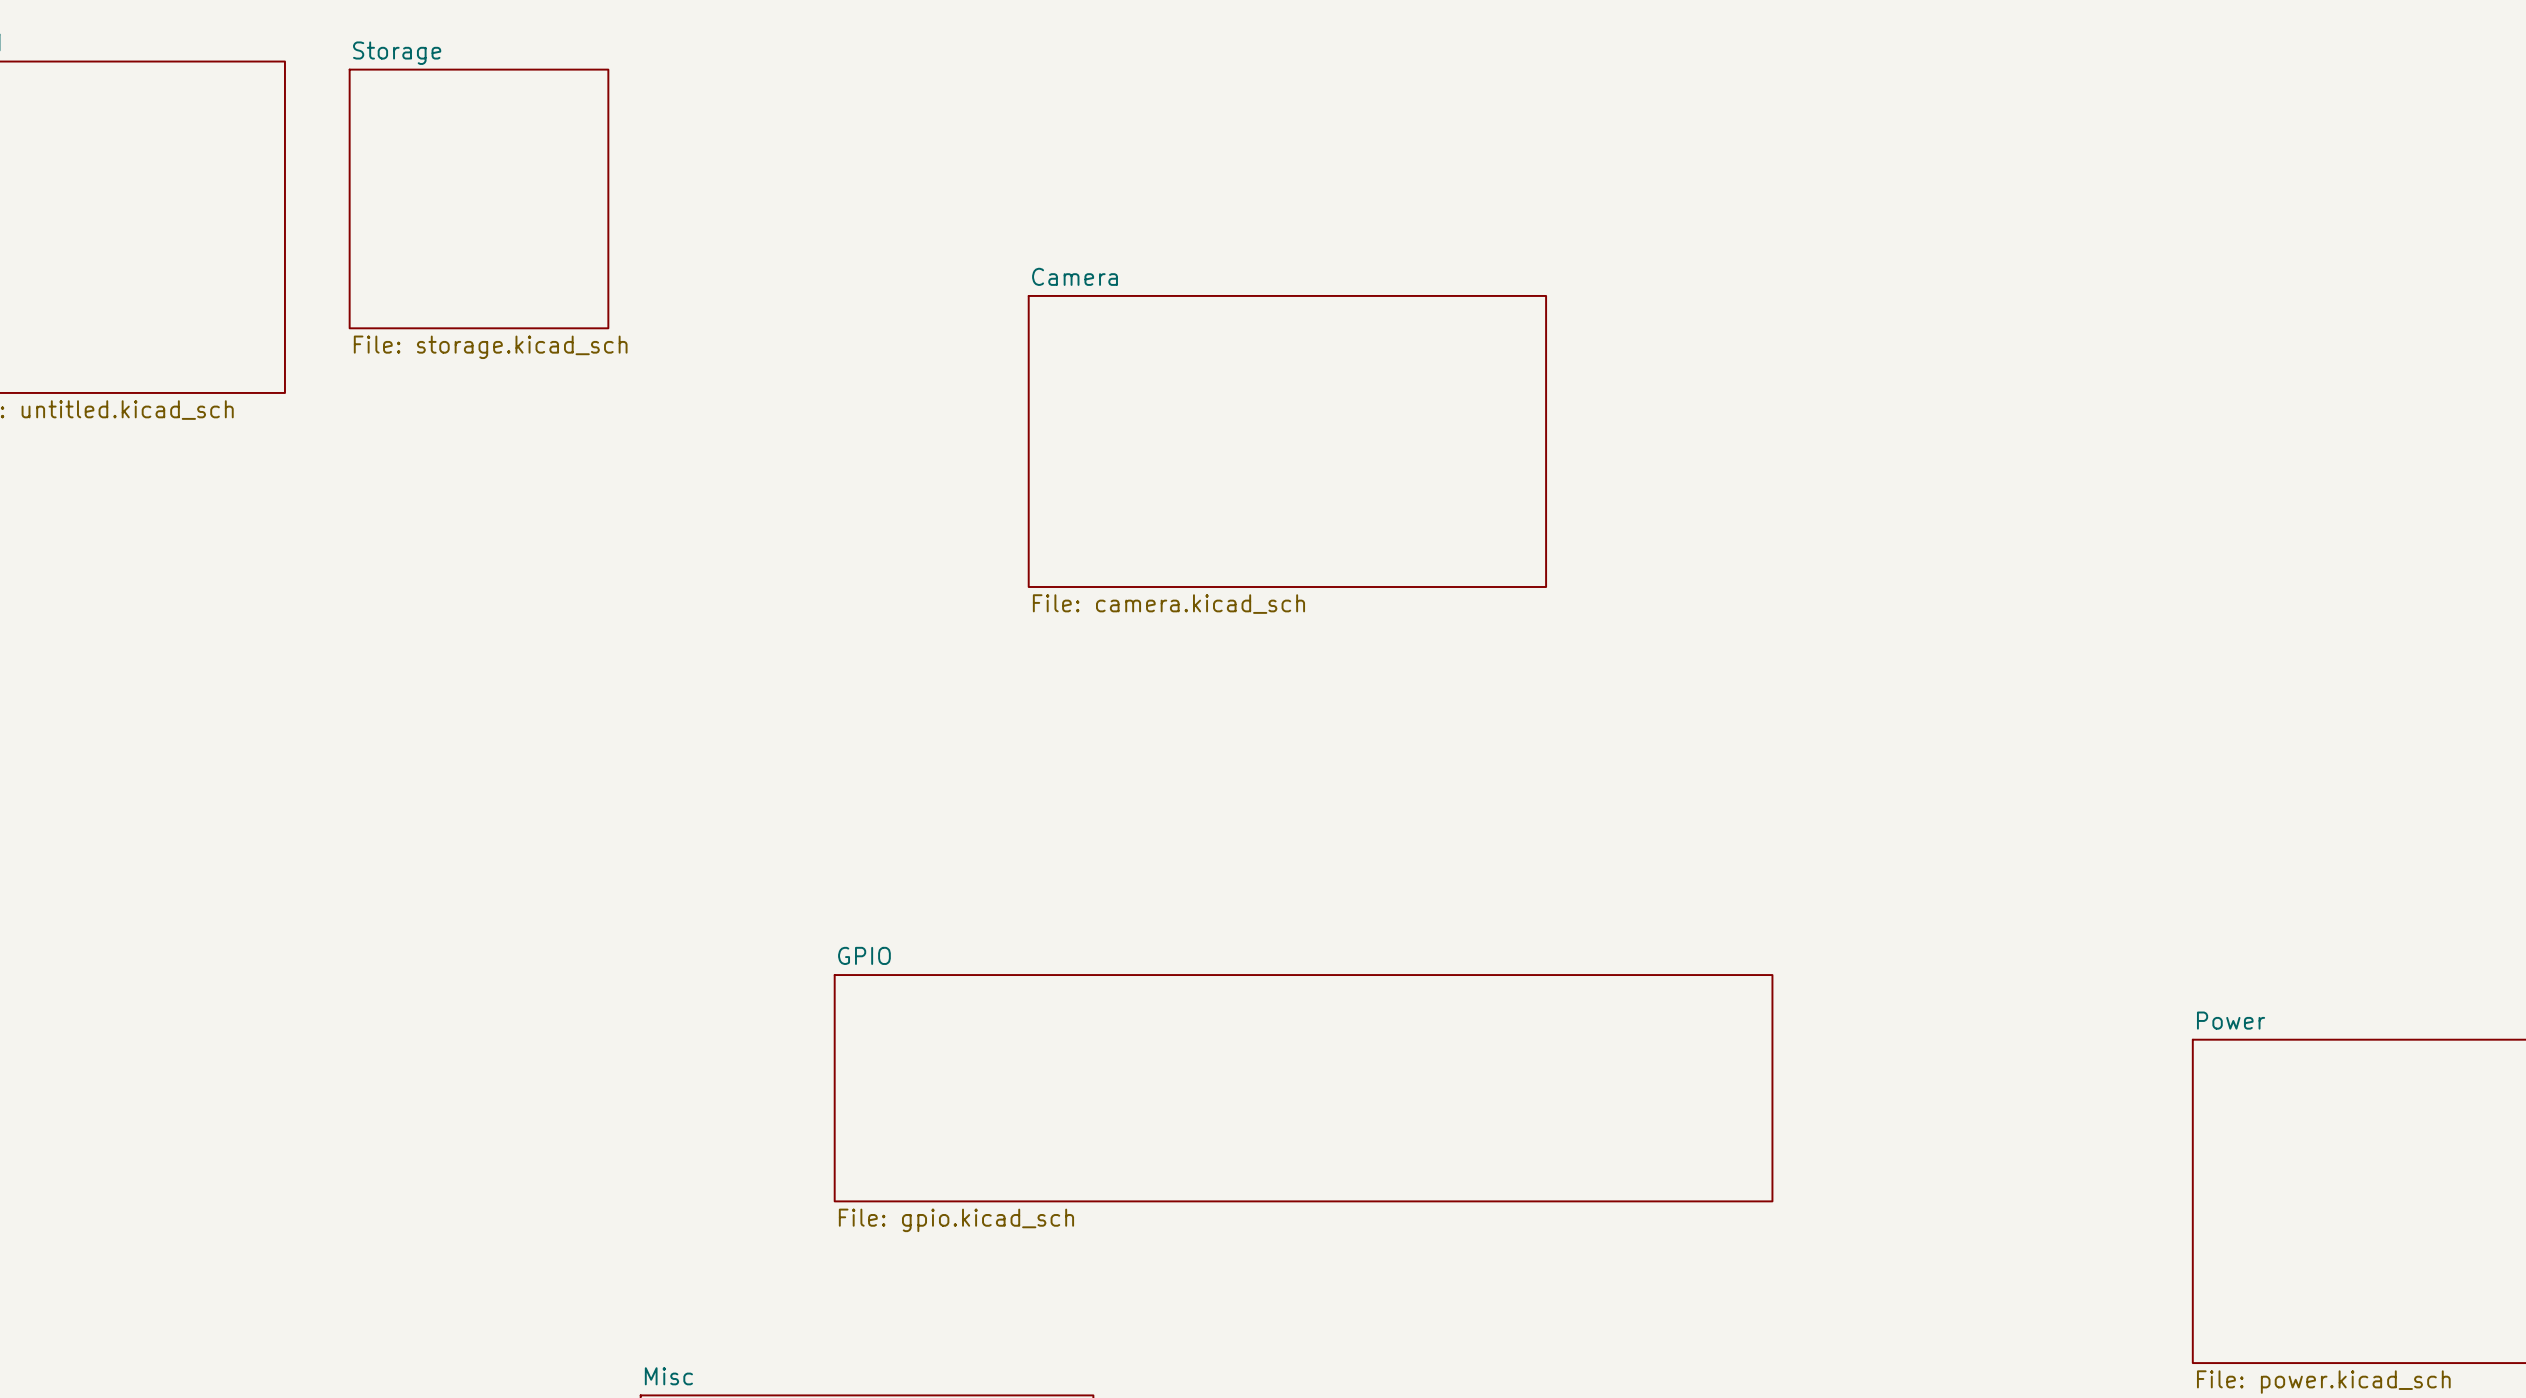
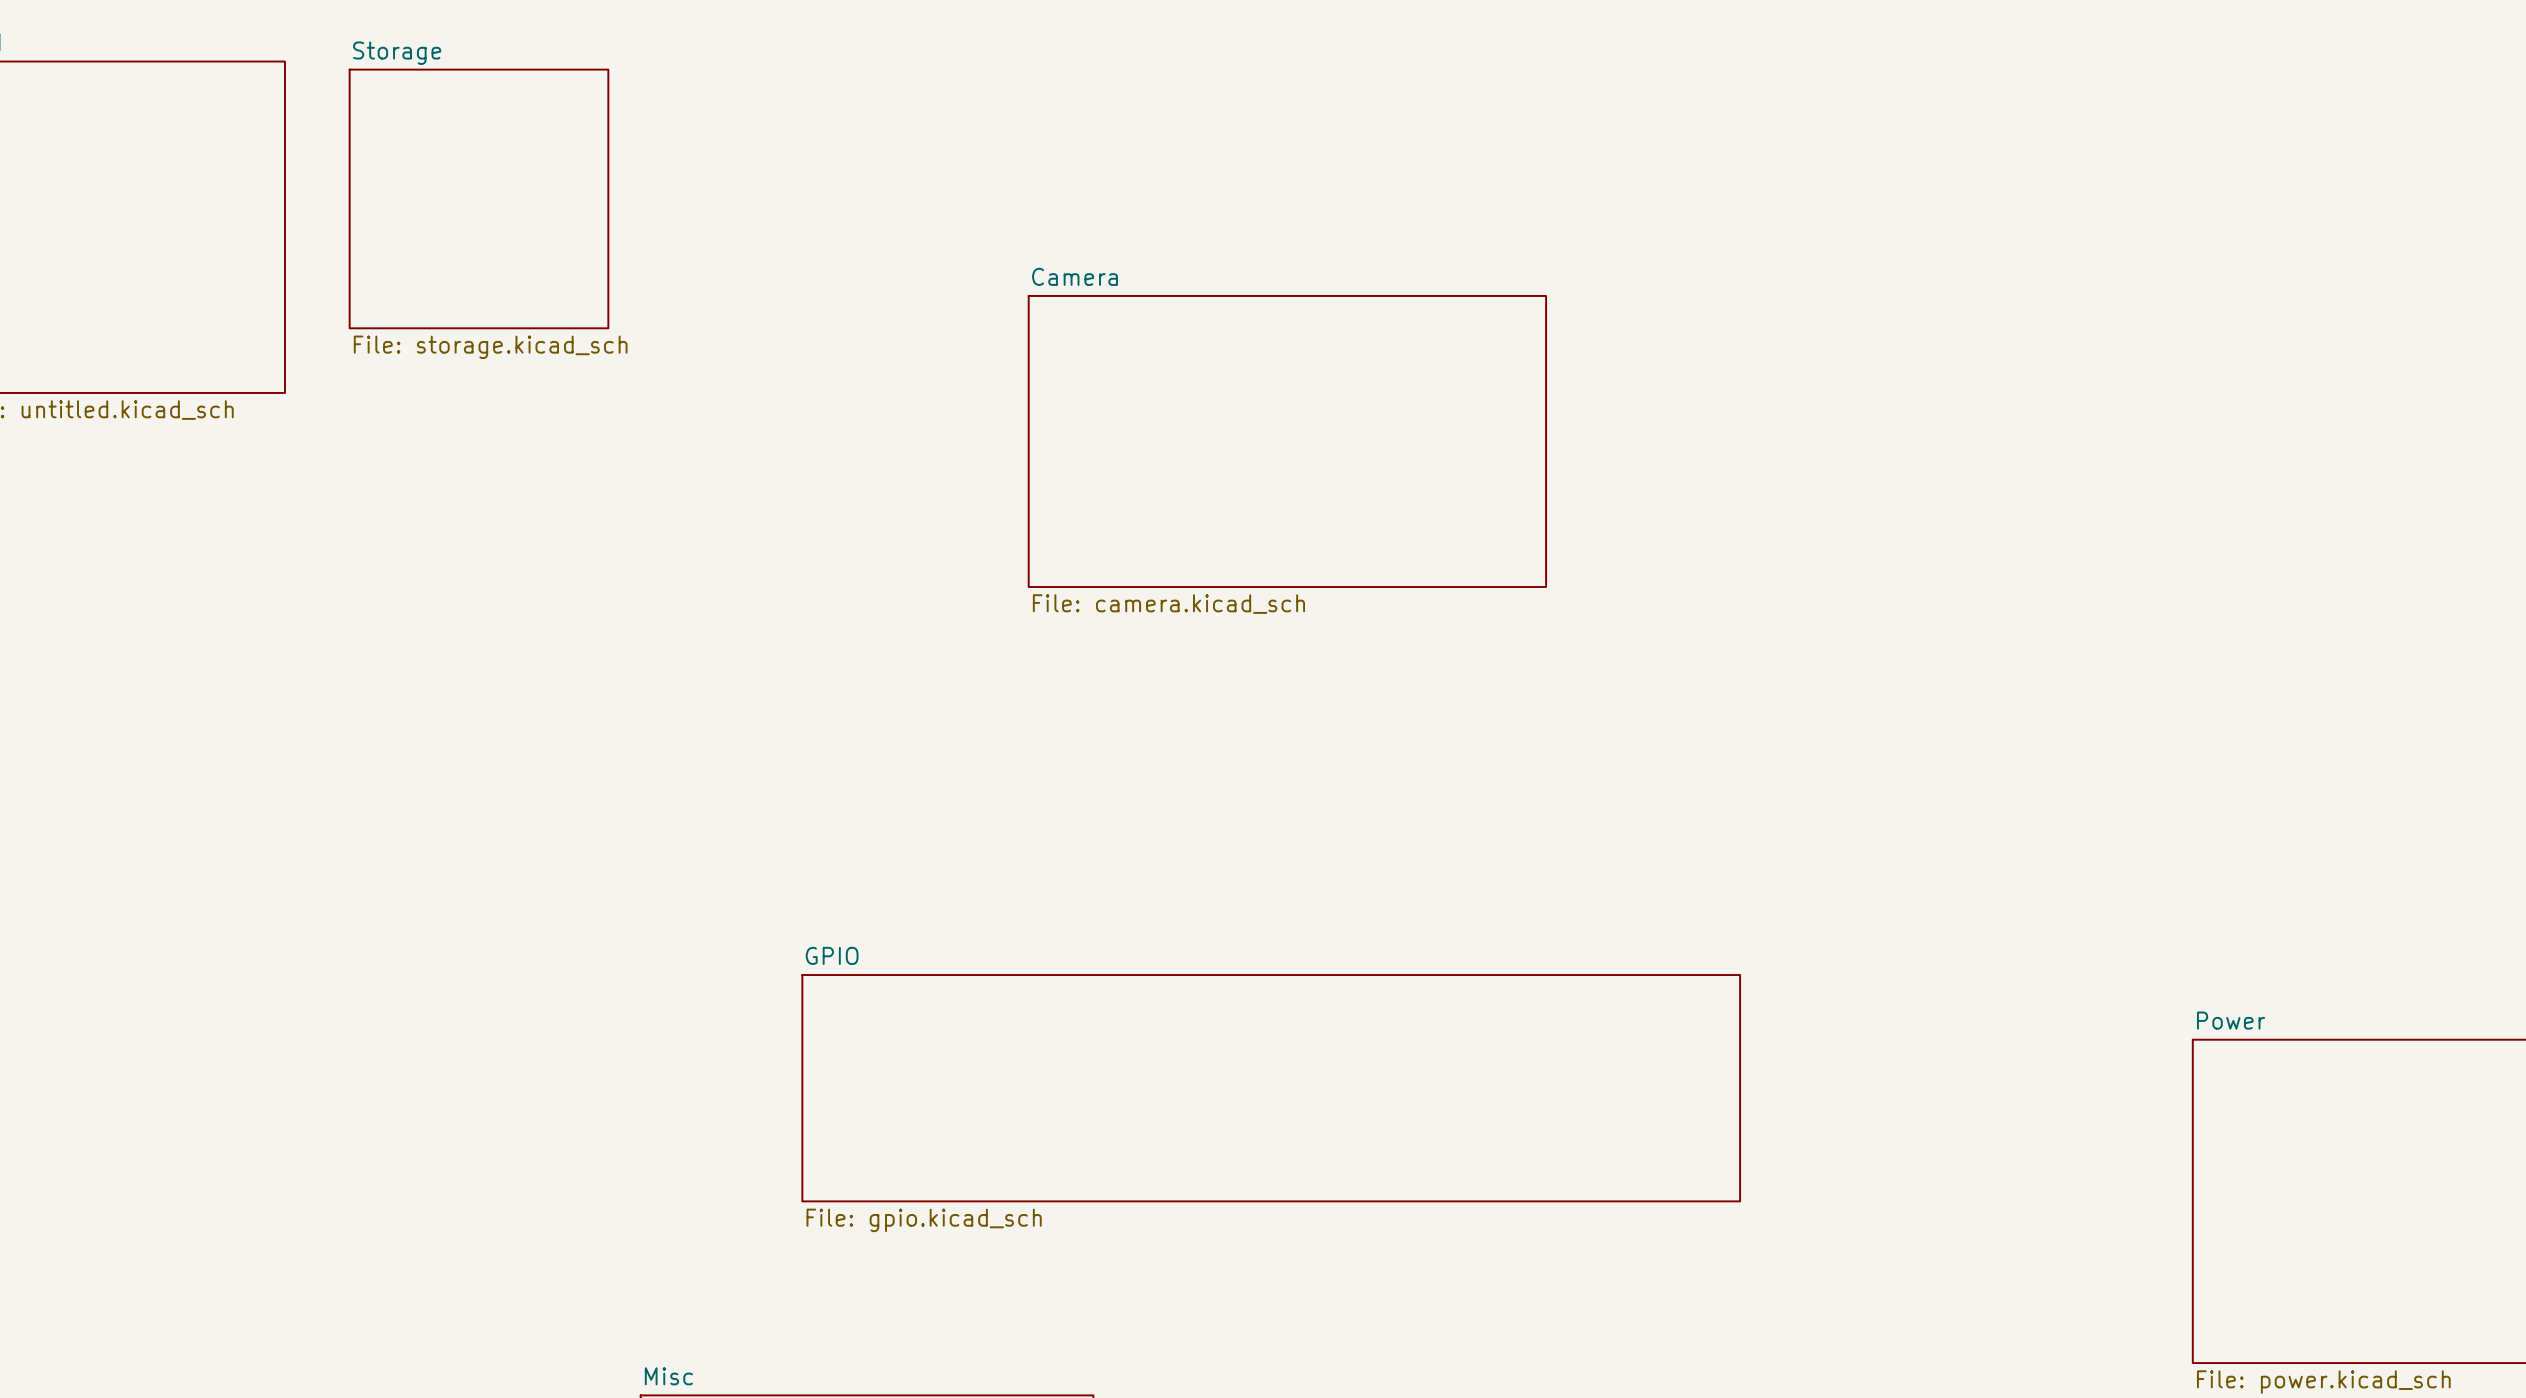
sheet GPIO position: (1303, 1088) -> (1271, 1088)

